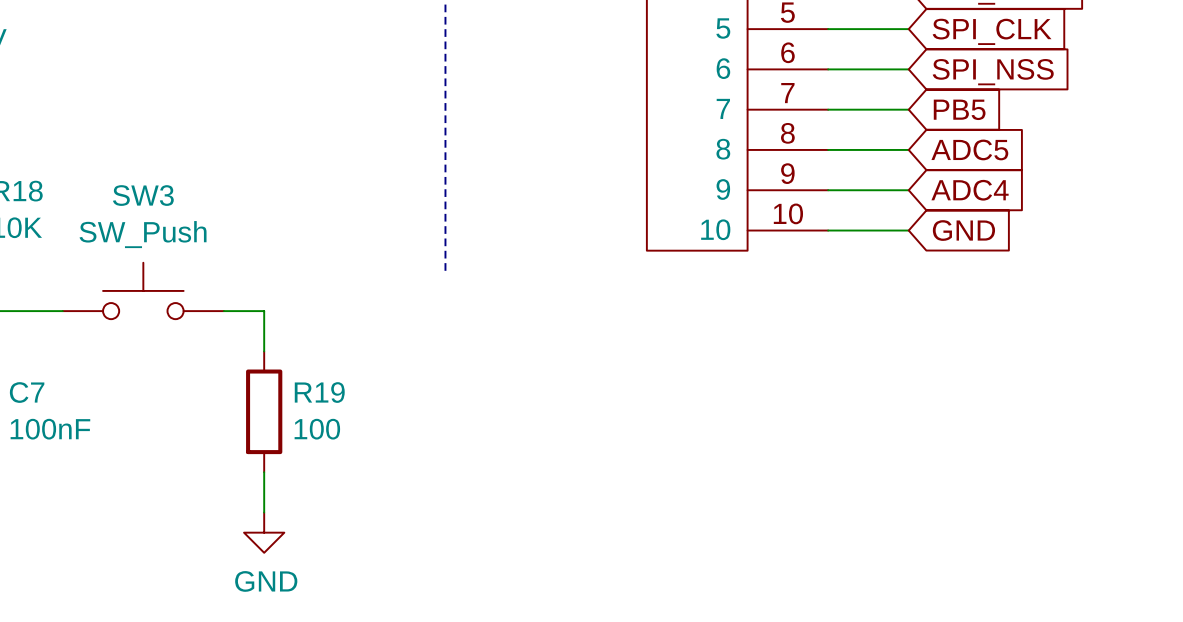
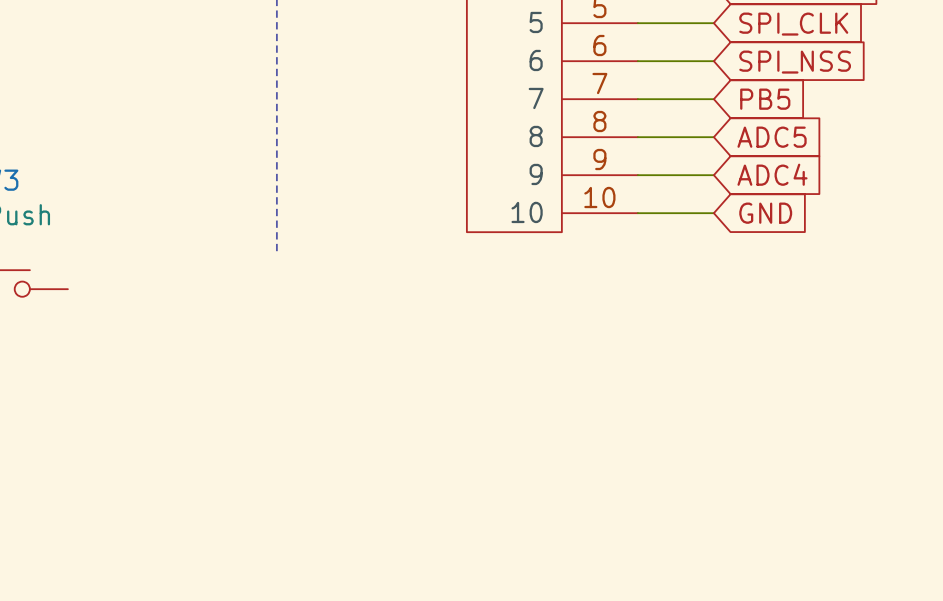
wire: (223, 311) (264, 311) (264, 351) -> none
R19: 100 (264, 411) -> none
wire: (264, 472) (264, 512) -> none
power symbol: GND (264, 532) -> none

